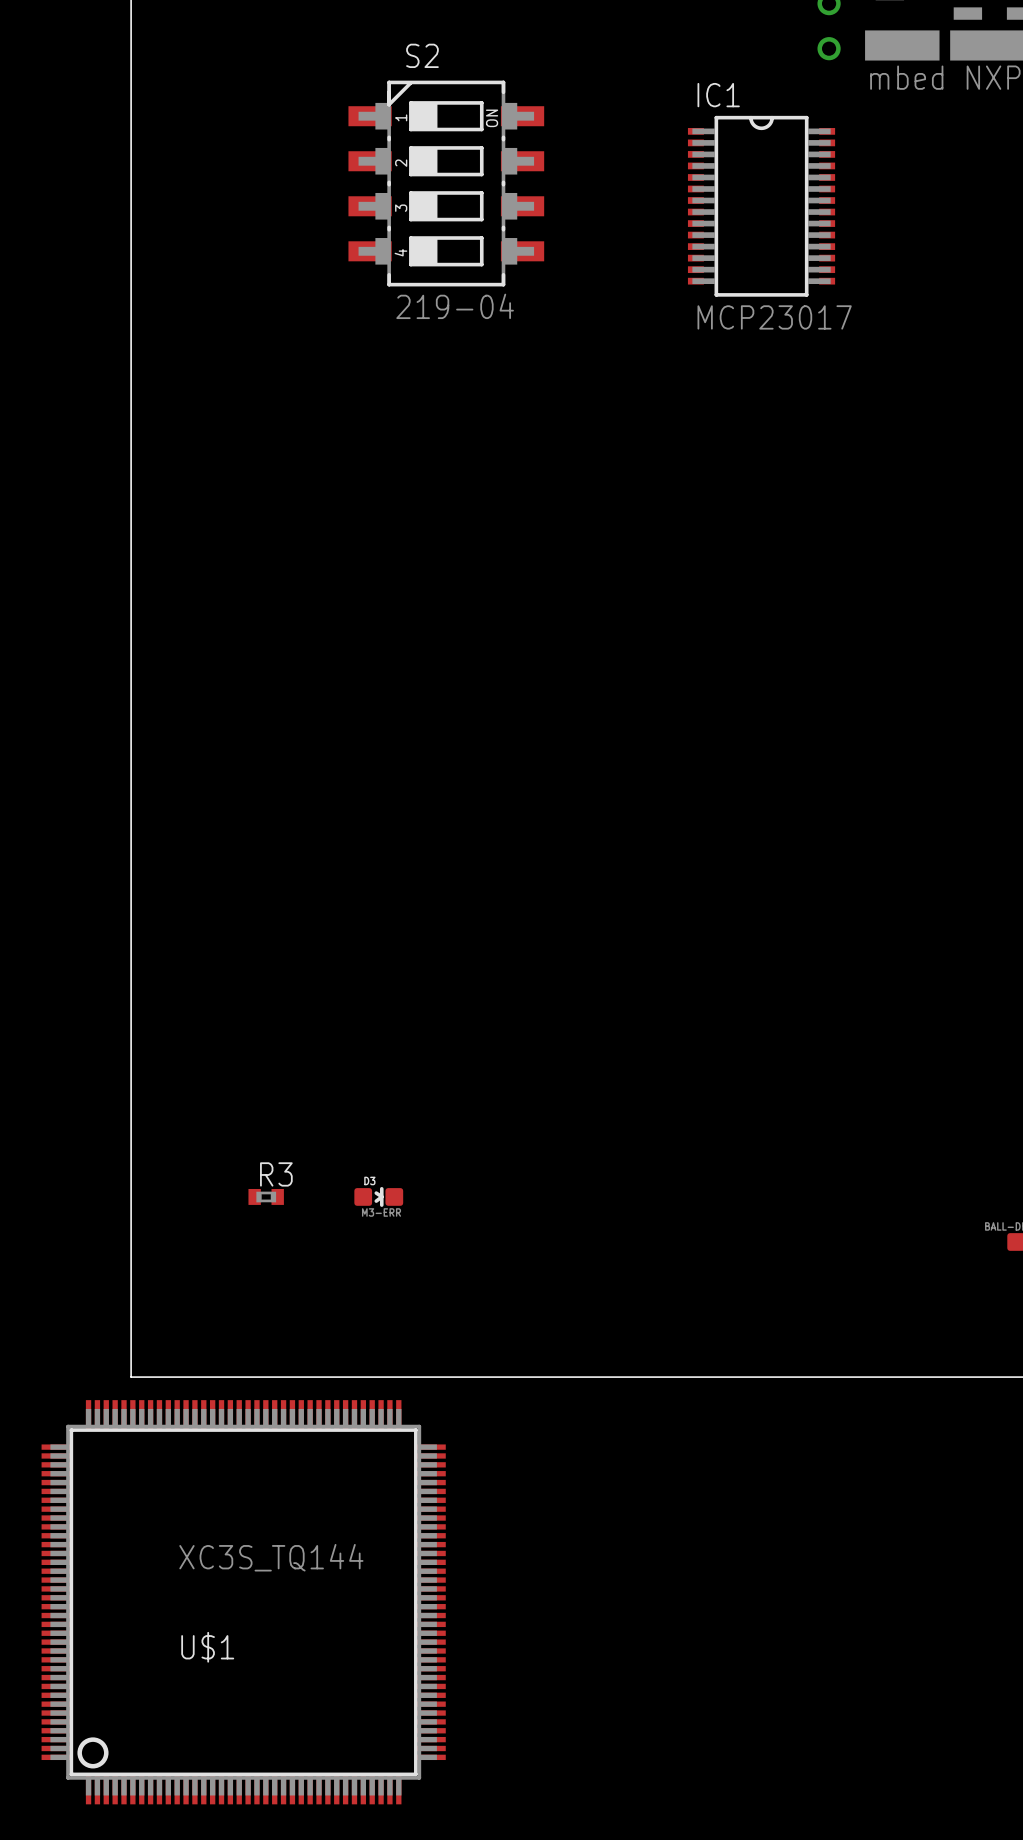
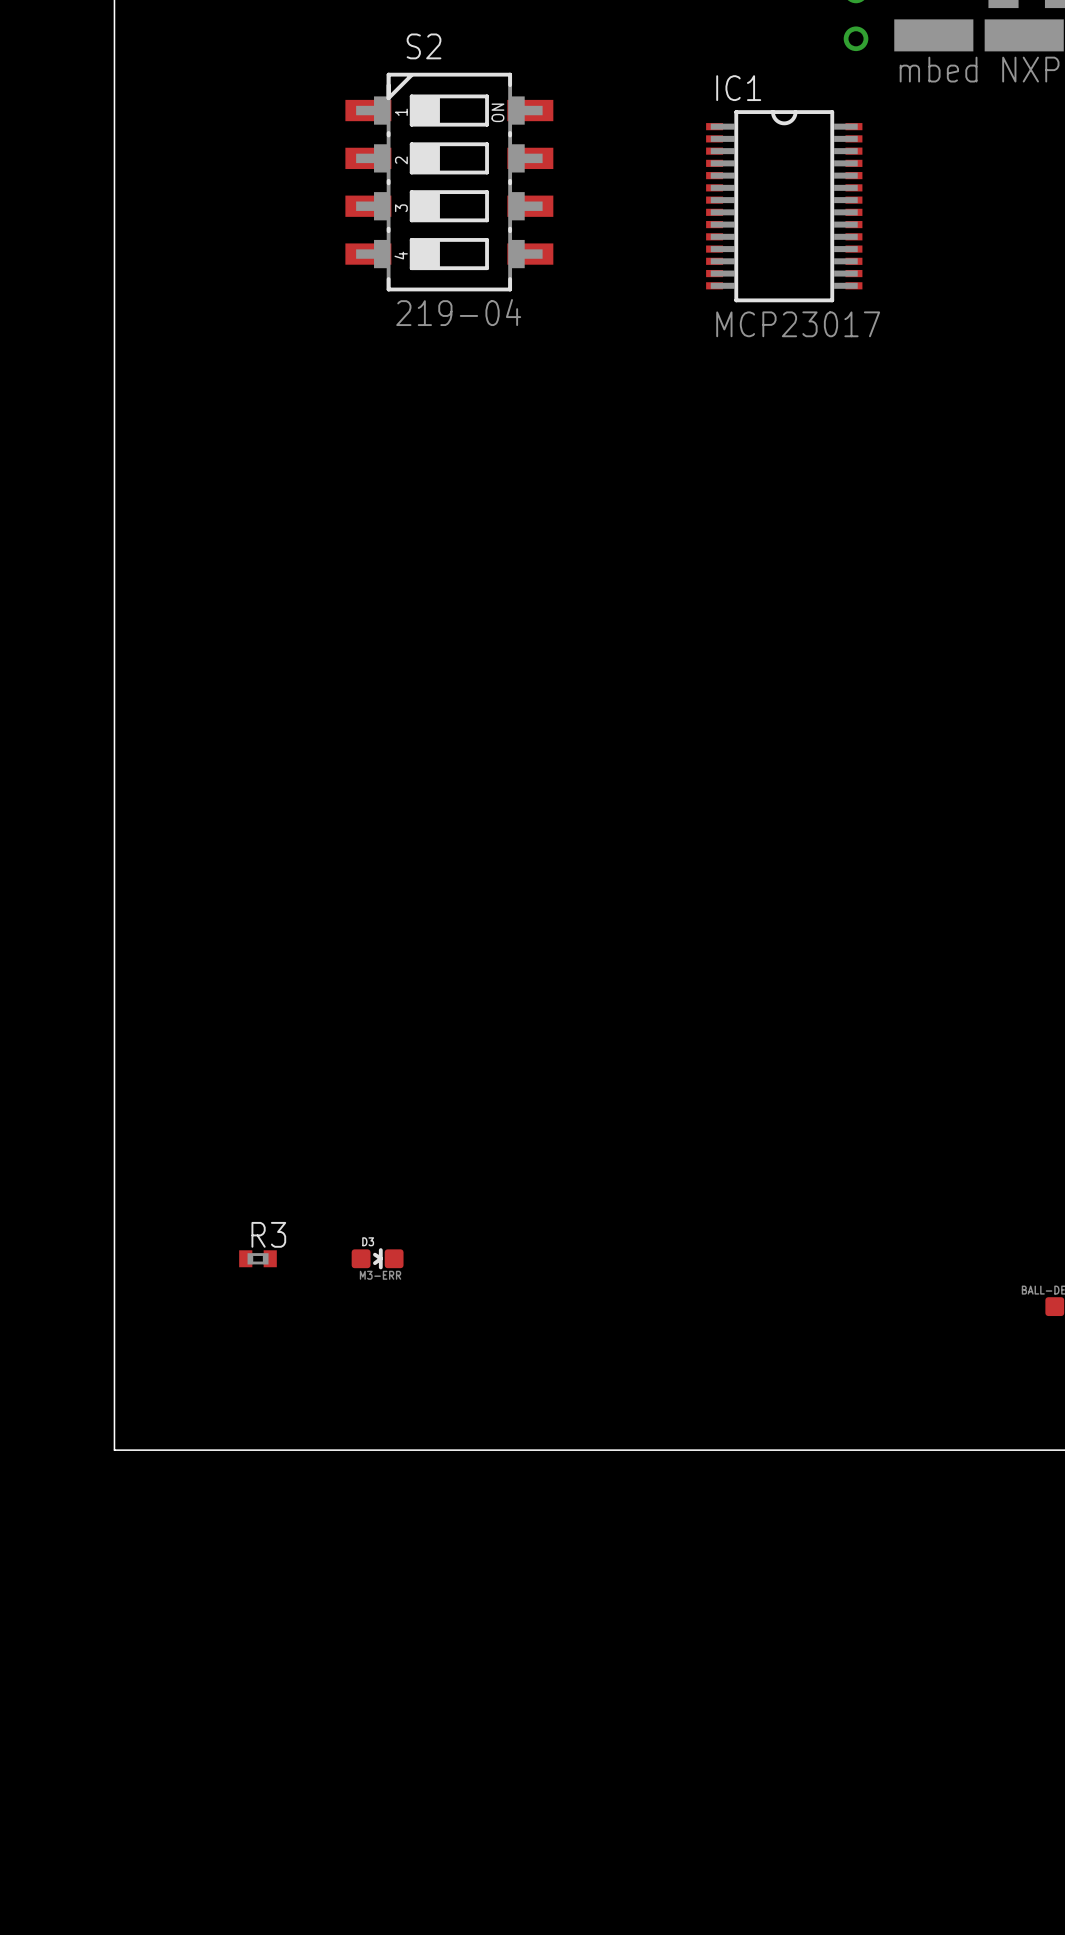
U$1: XC3S_TQ144 (243, 1602) -> none

